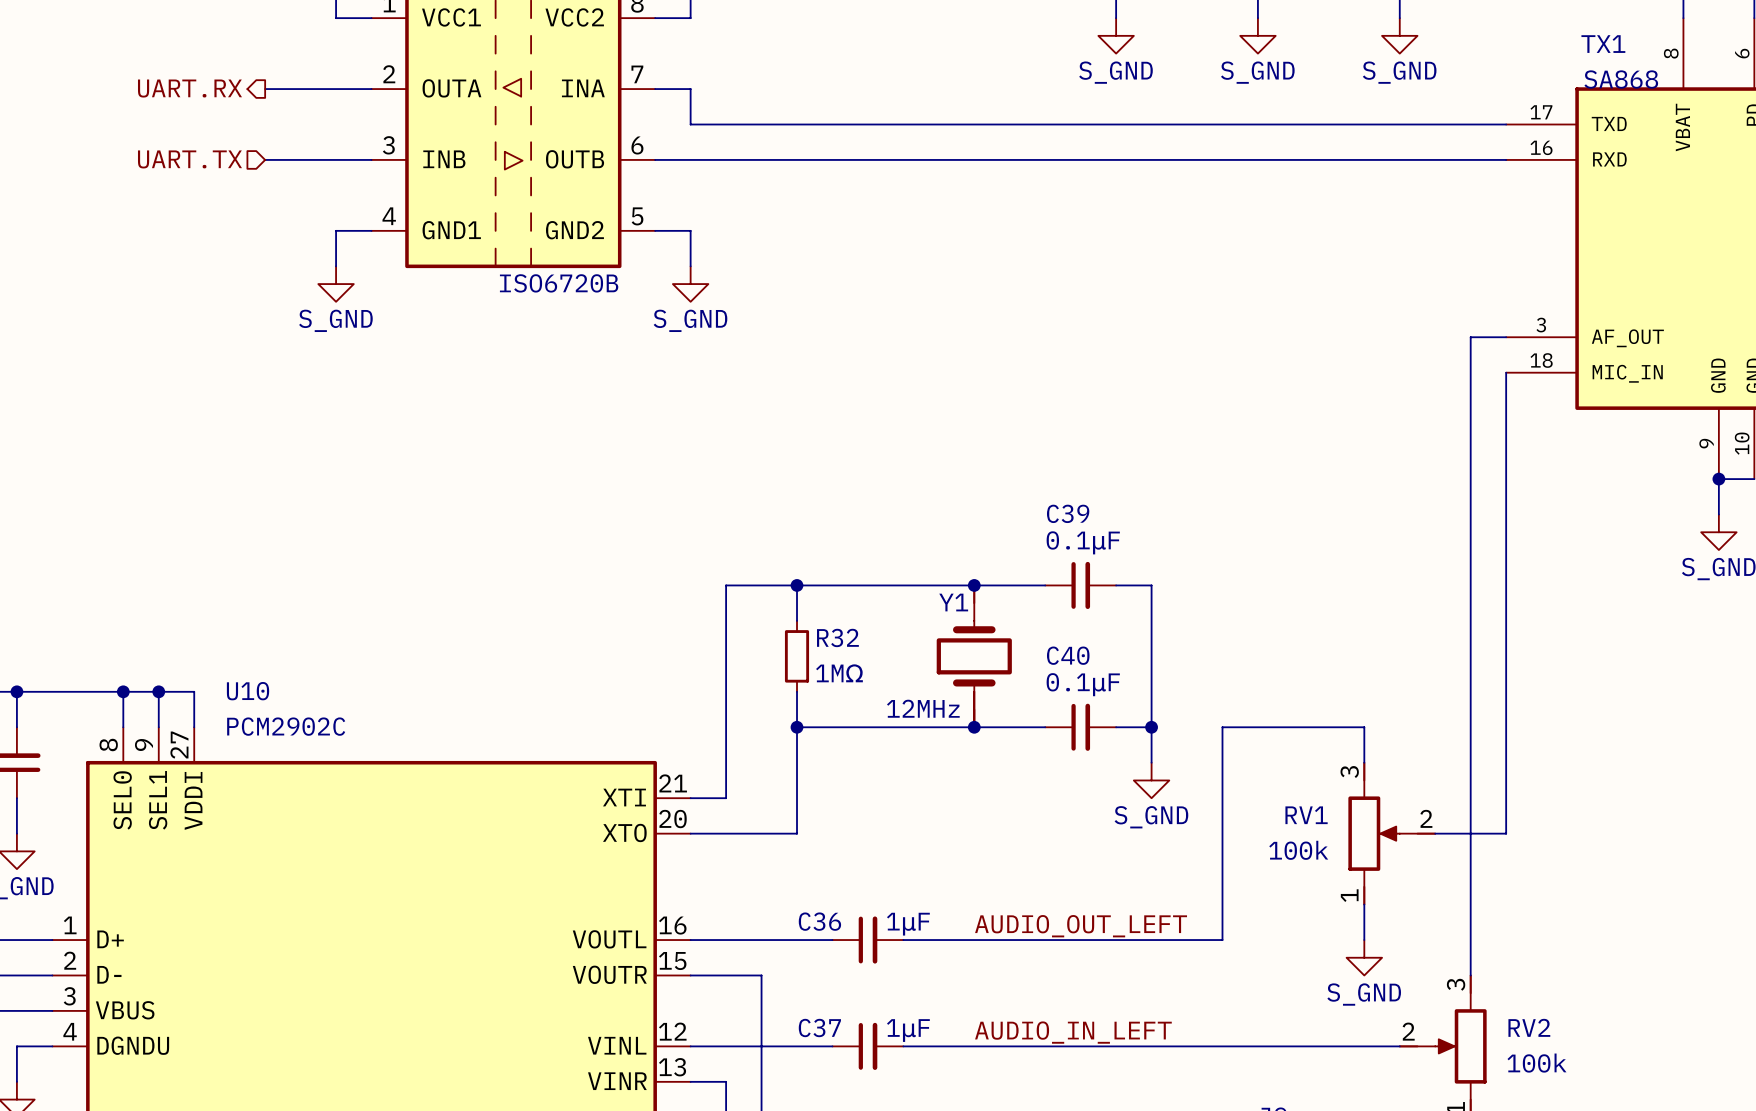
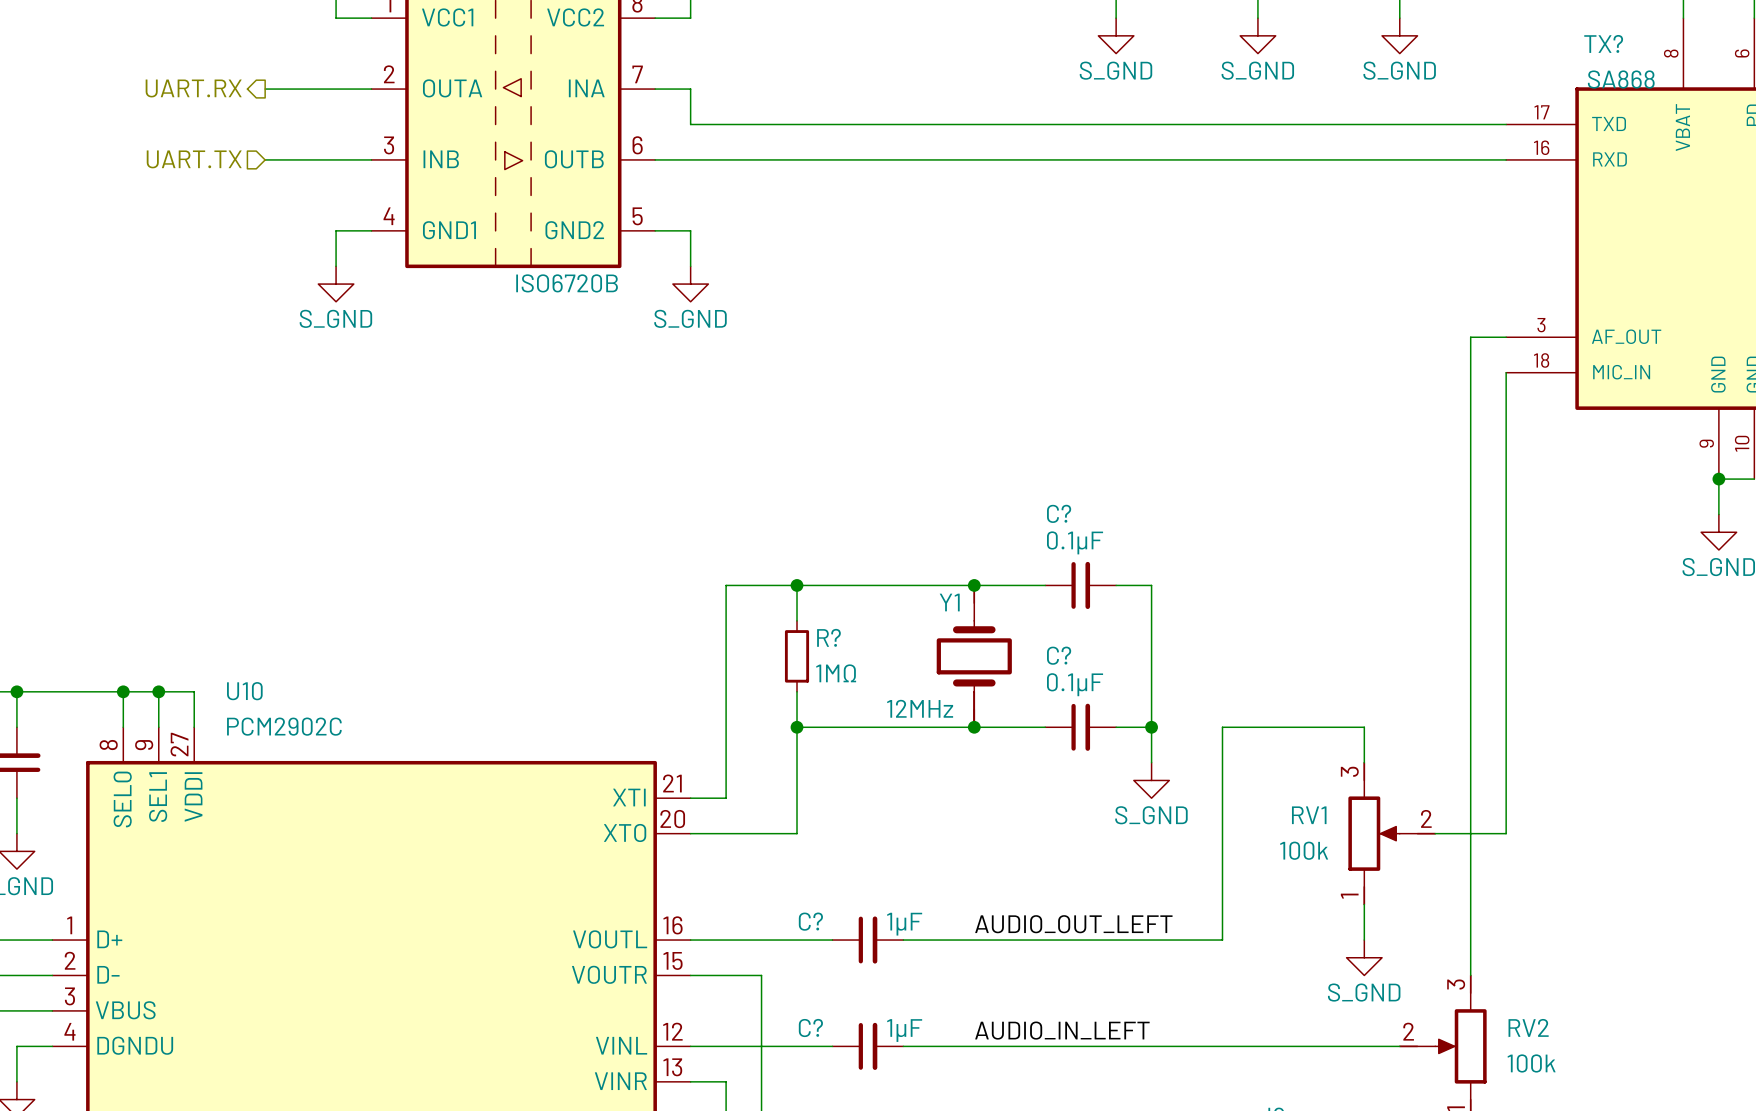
TX1 name: TX1 (1603, 44) -> TX? (1603, 43)
C39 name: C39 (1068, 513) -> C? (1059, 513)
R32 name: R32 (837, 637) -> R? (828, 637)
C40 name: C40 (1068, 655) -> C? (1059, 655)
C36 name: C36 (819, 921) -> C? (810, 921)
C37 name: C37 (819, 1028) -> C? (810, 1028)

